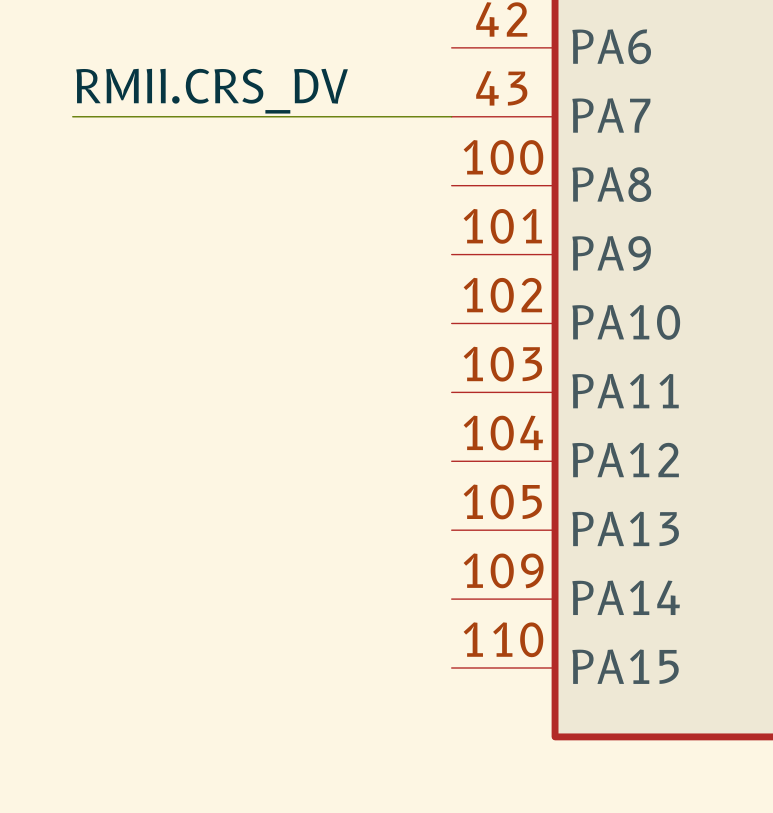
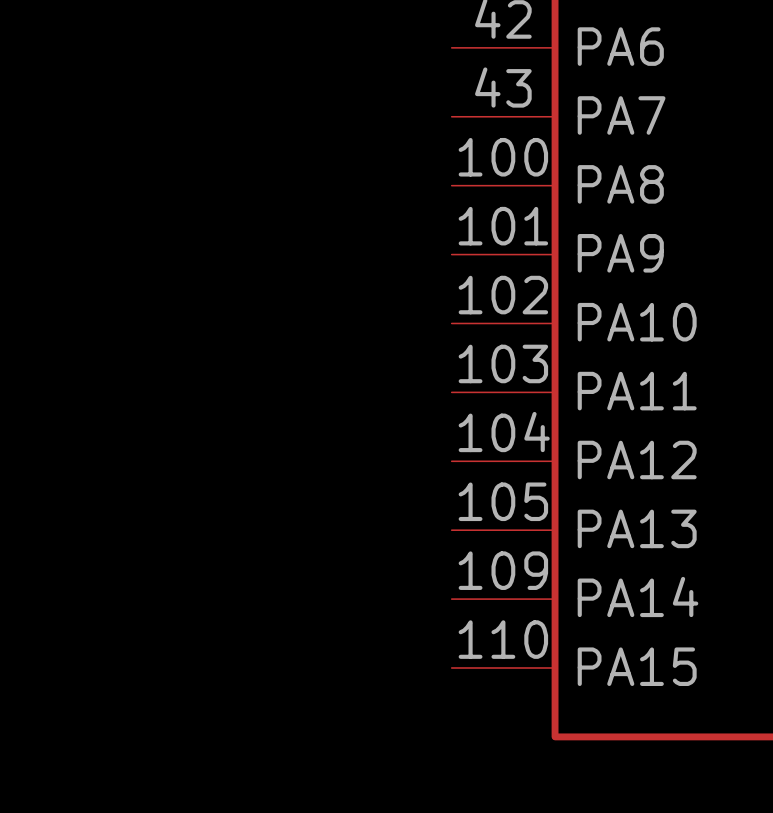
label: RMII.CRS_DV (212, 91) -> none
wire: (72, 116) (451, 116) -> none

